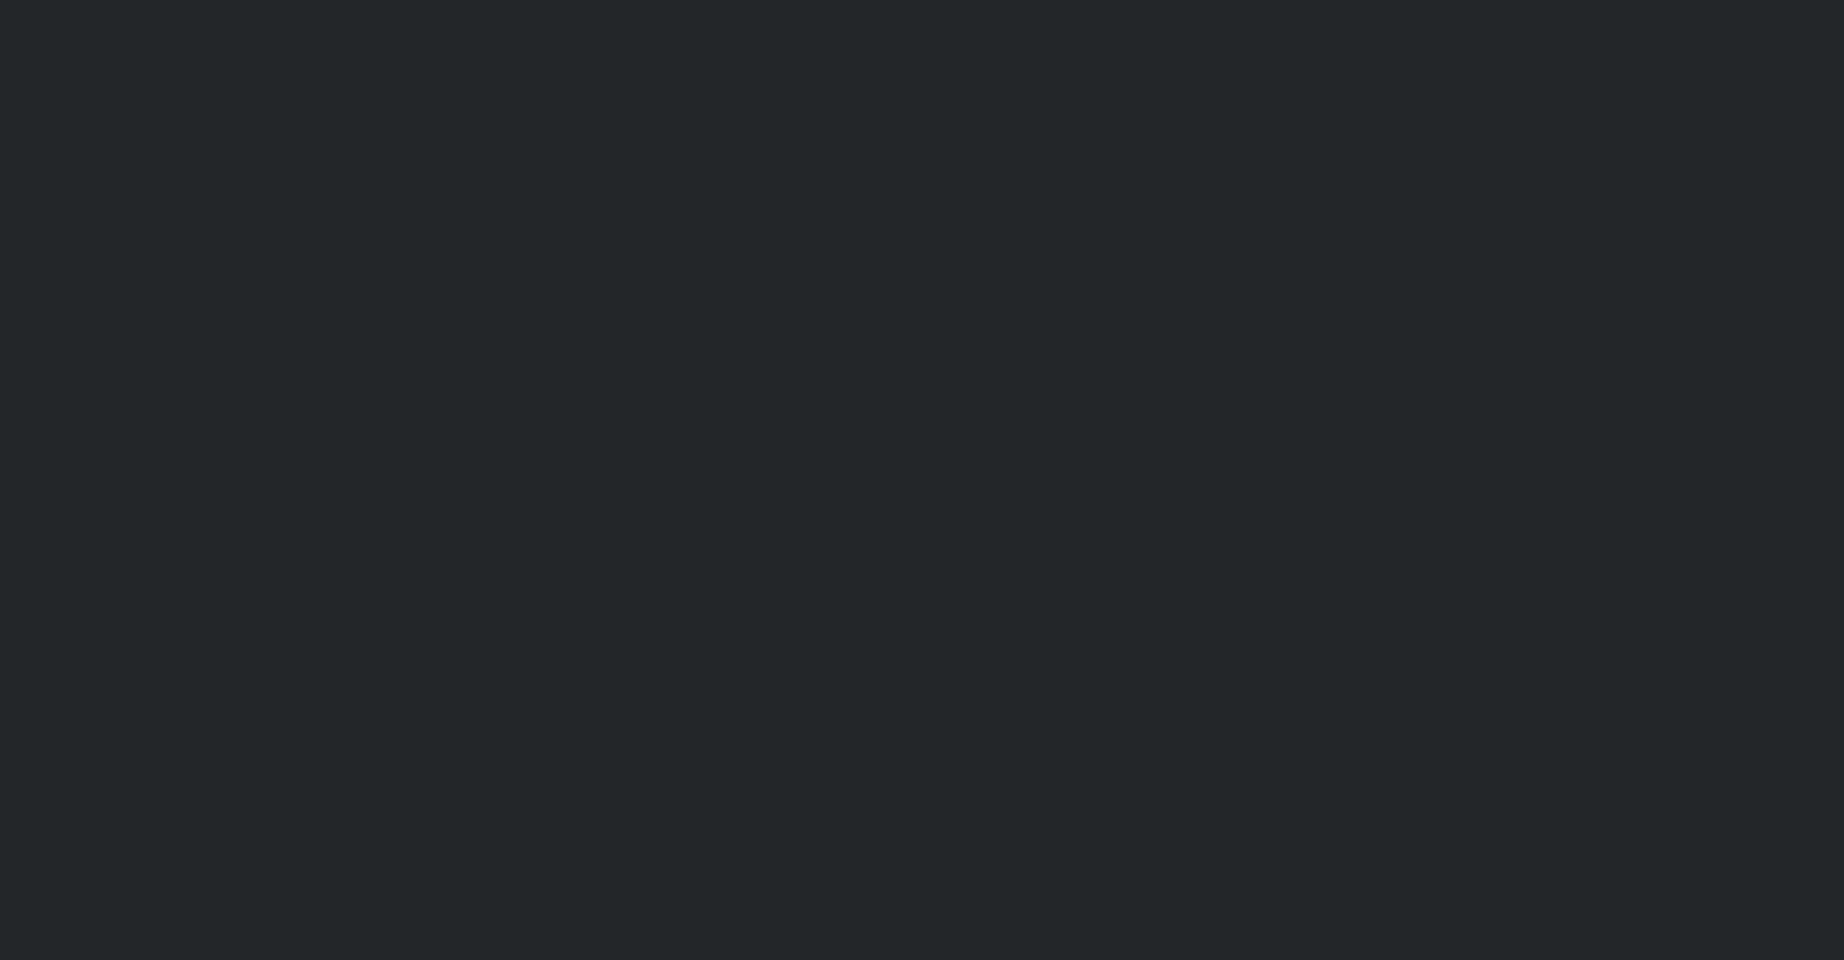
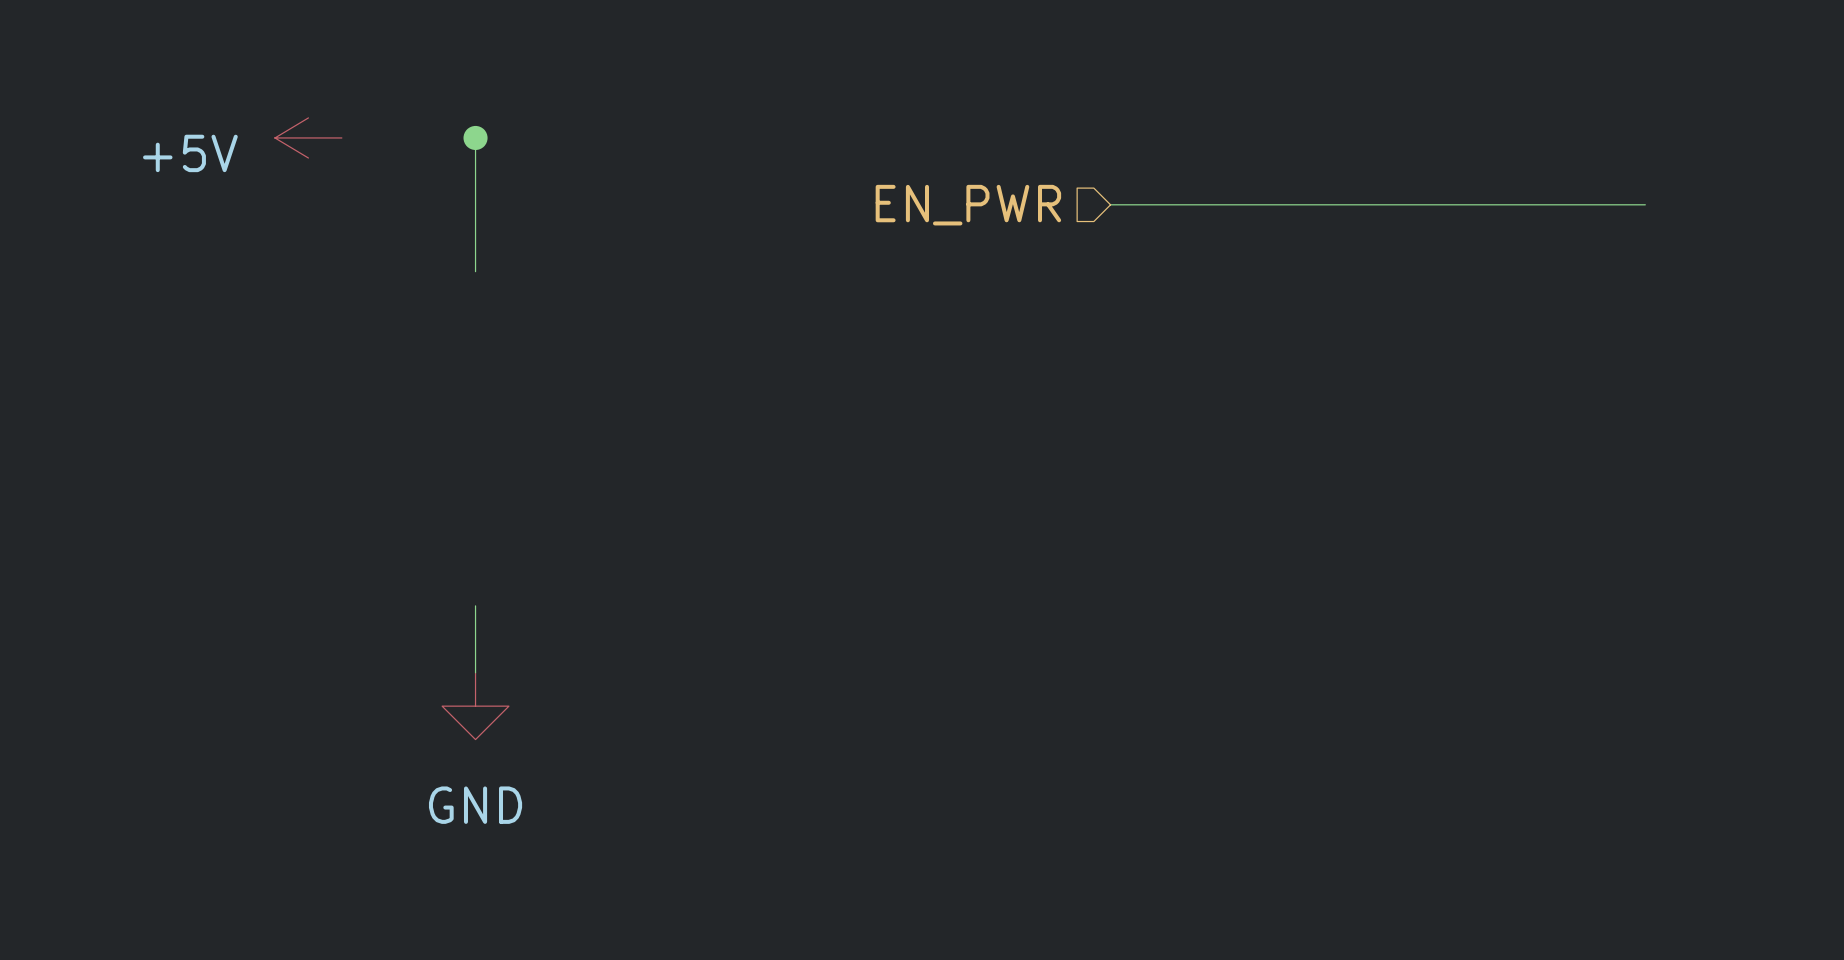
power symbol: none -> +5V (308, 137)
wire: none -> (475, 137) (475, 271)
junction: none -> (475, 137)
wire: none -> (1110, 204) (1645, 204)
hierarchical label: none -> EN_PWR (968, 205)
wire: none -> (475, 605) (475, 672)
power symbol: none -> GND (475, 706)

